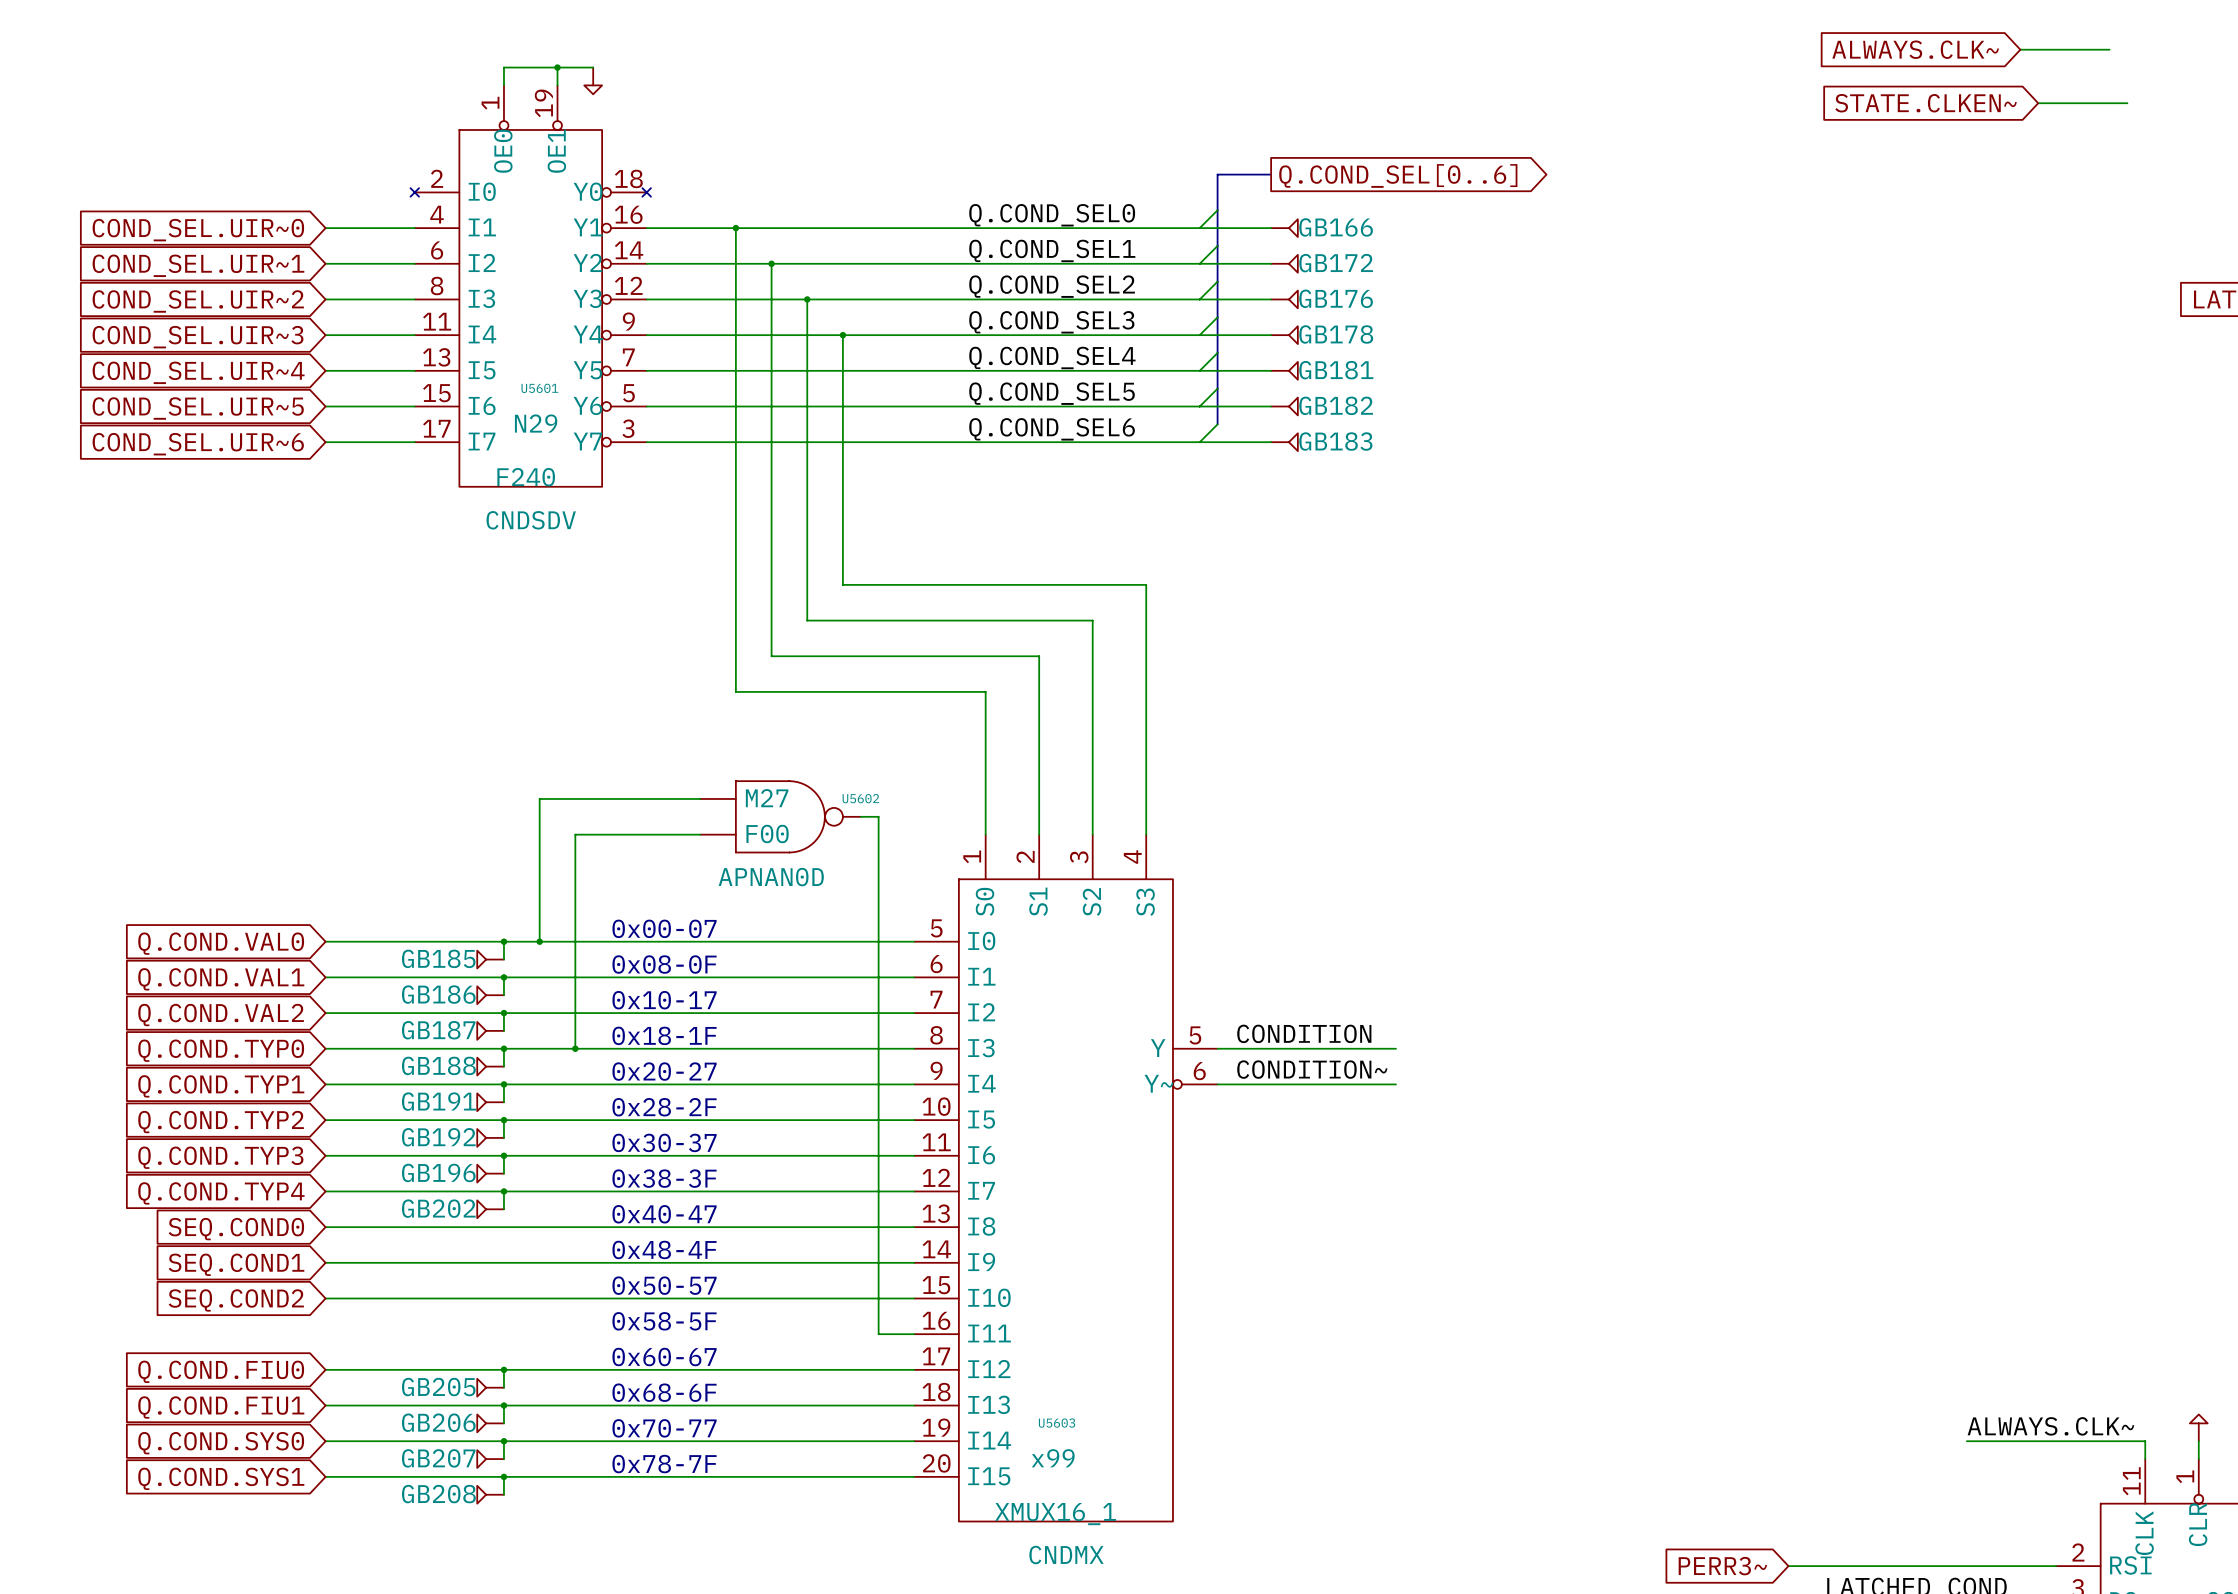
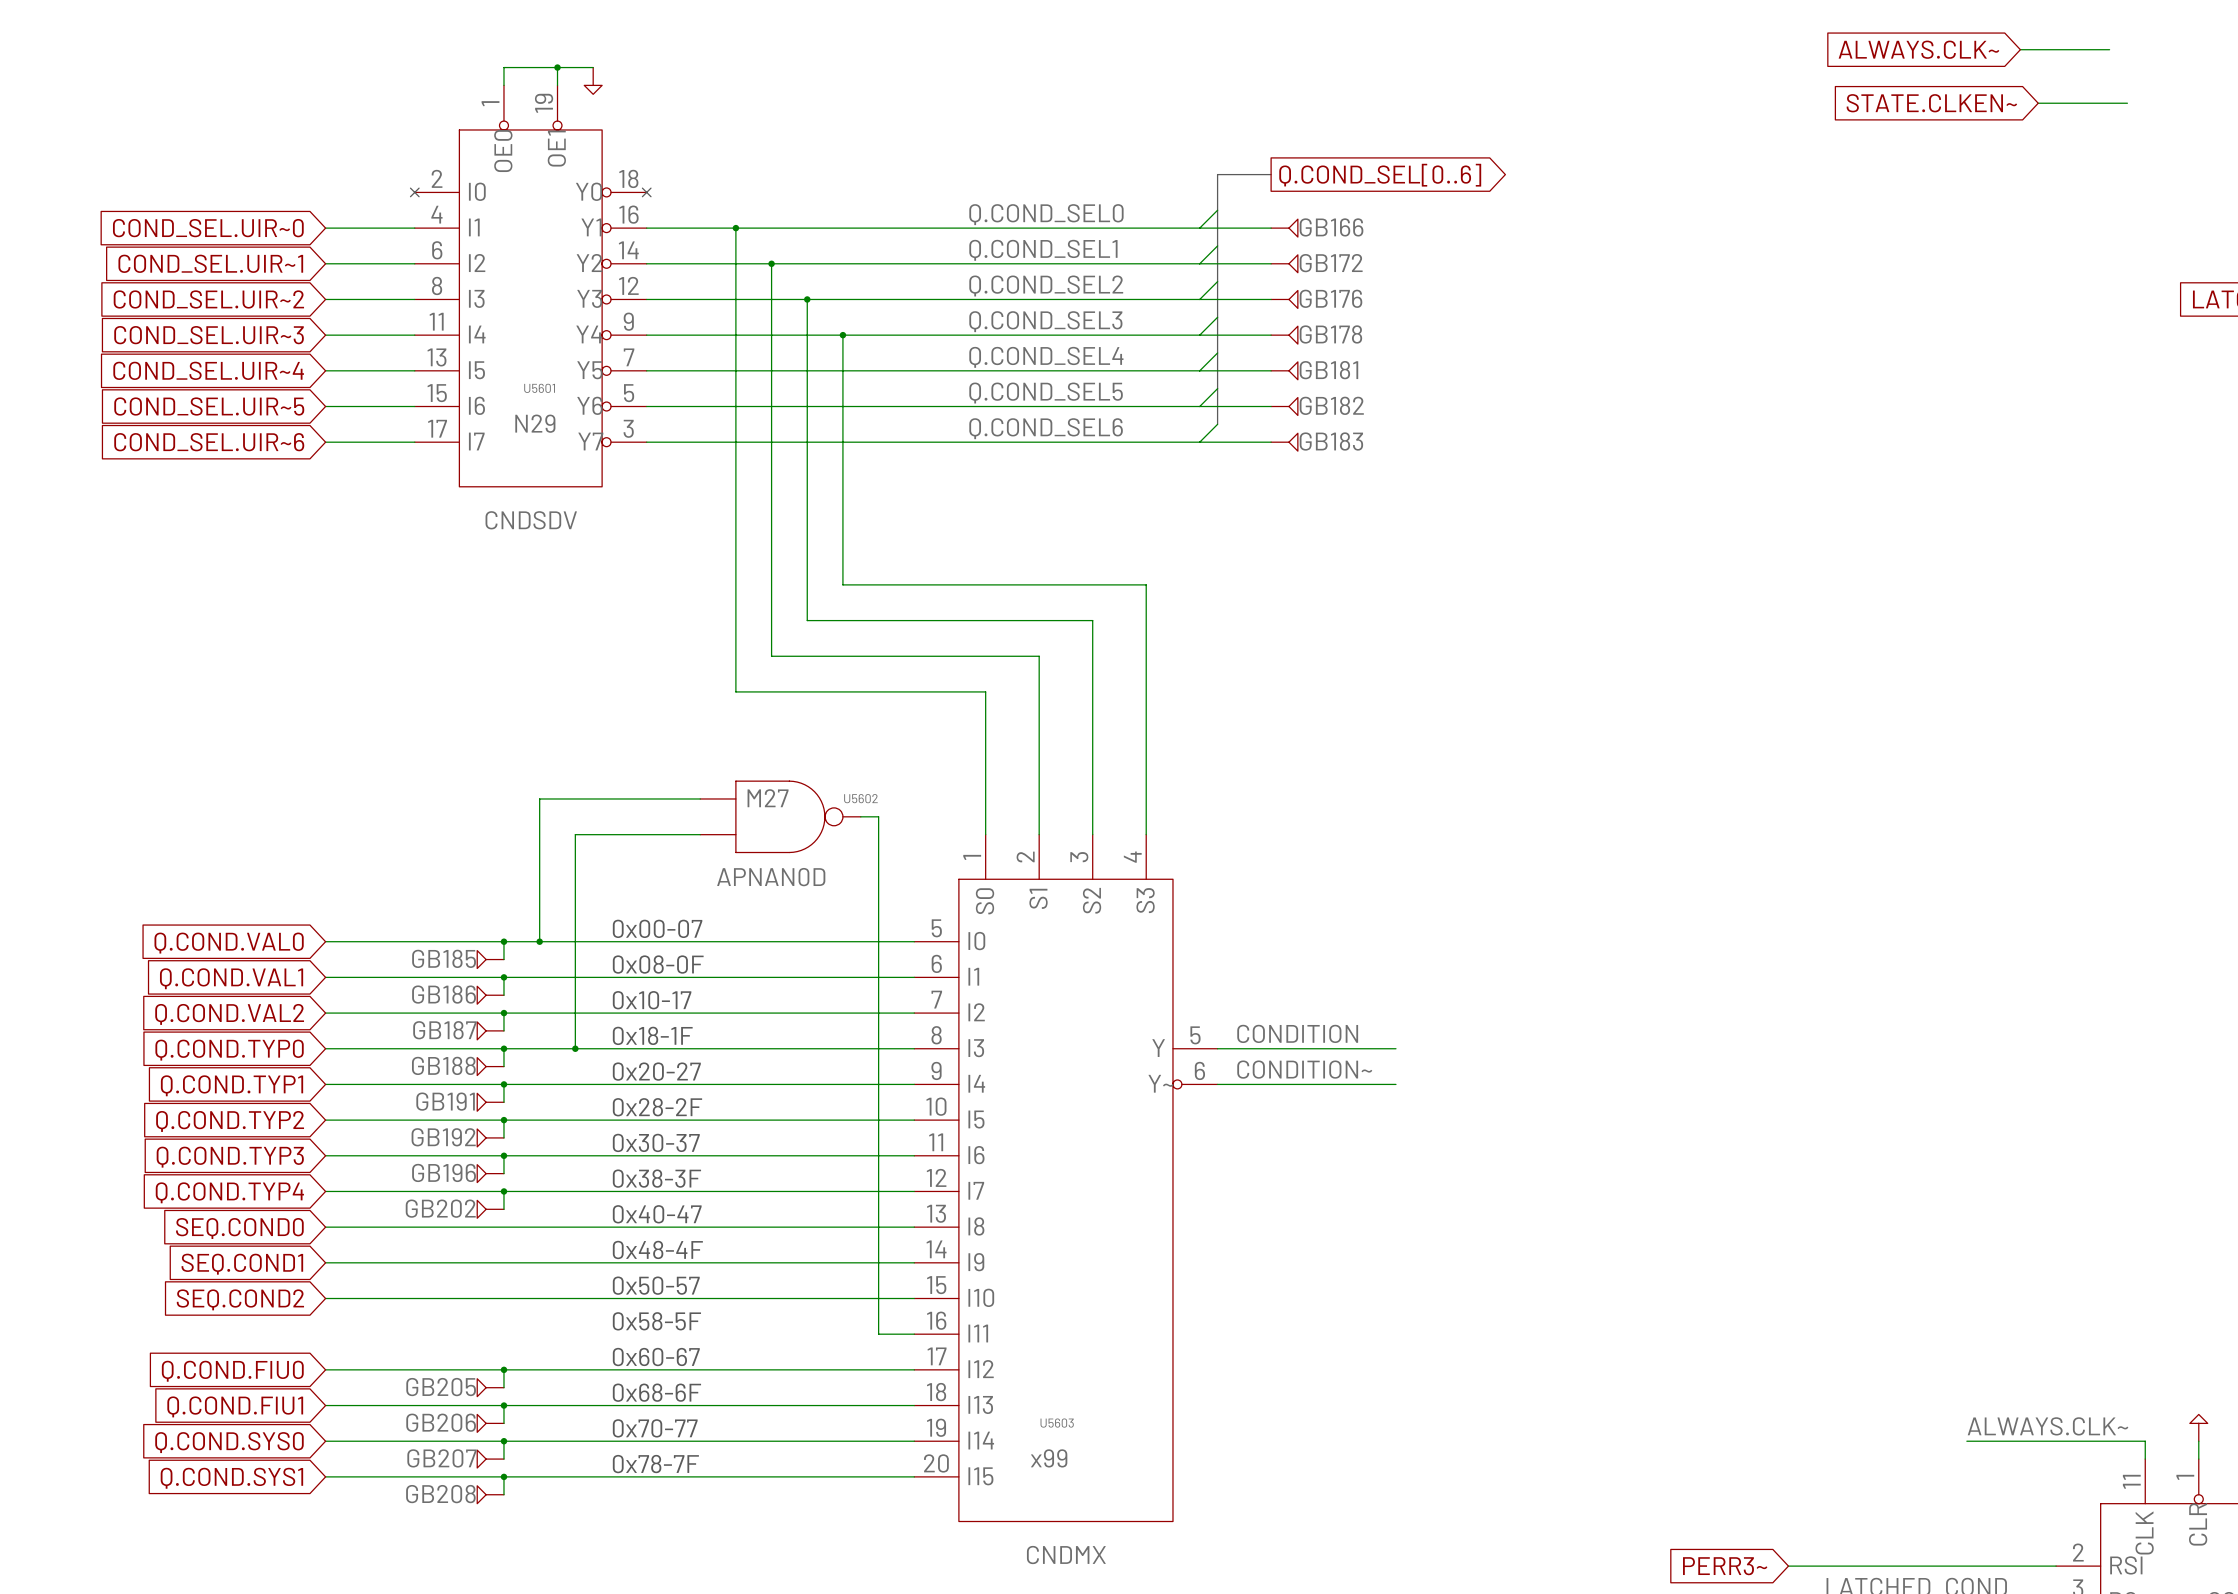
U5601 value: F240 (526, 477) -> none
U5602 value: F00 (767, 834) -> none
U5603 value: XMUX16_1 (1055, 1514) -> none

